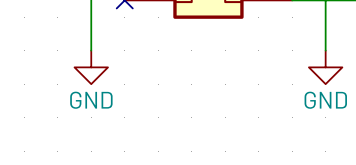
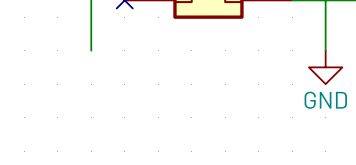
power symbol: GND (91, 67) -> none

